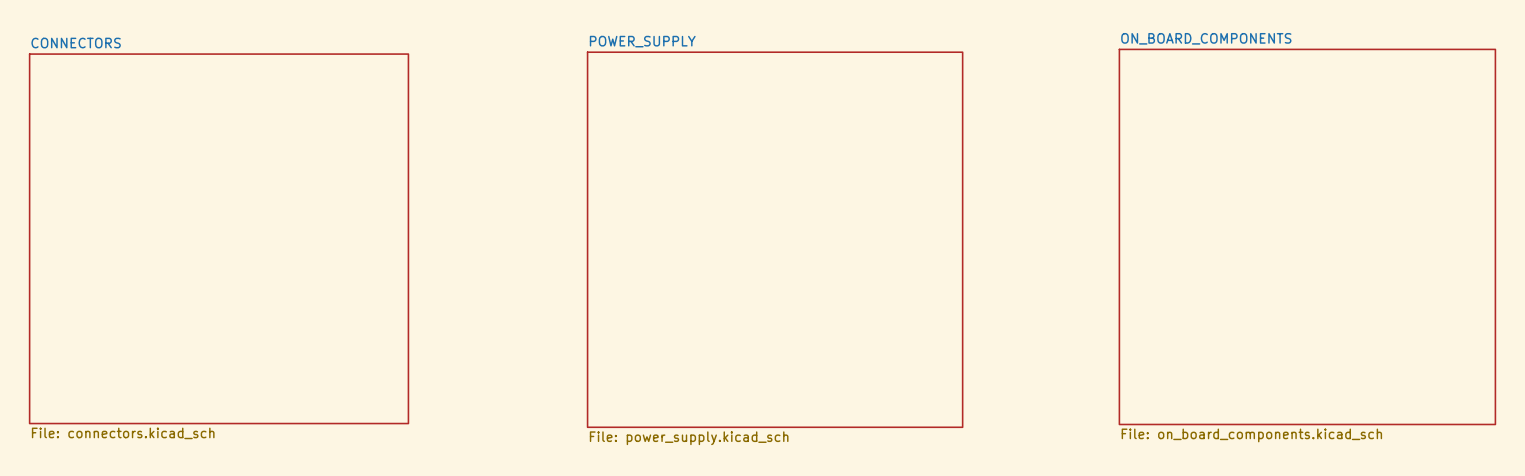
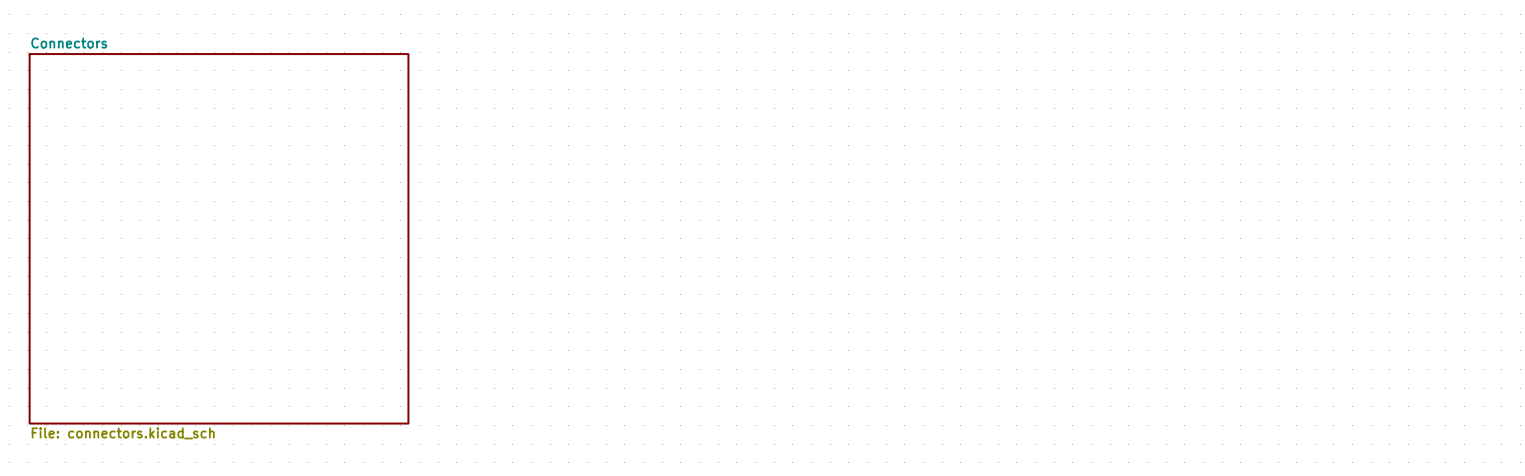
sheet CONNECTORS name: CONNECTORS (76, 43) -> Connectors (69, 43)
sheet ON_BOARD_COMPONENTS: File: on_board_components.kicad_sch (1307, 236) -> none
sheet POWER_SUPPLY: File: power_supply.kicad_sch (775, 239) -> none

